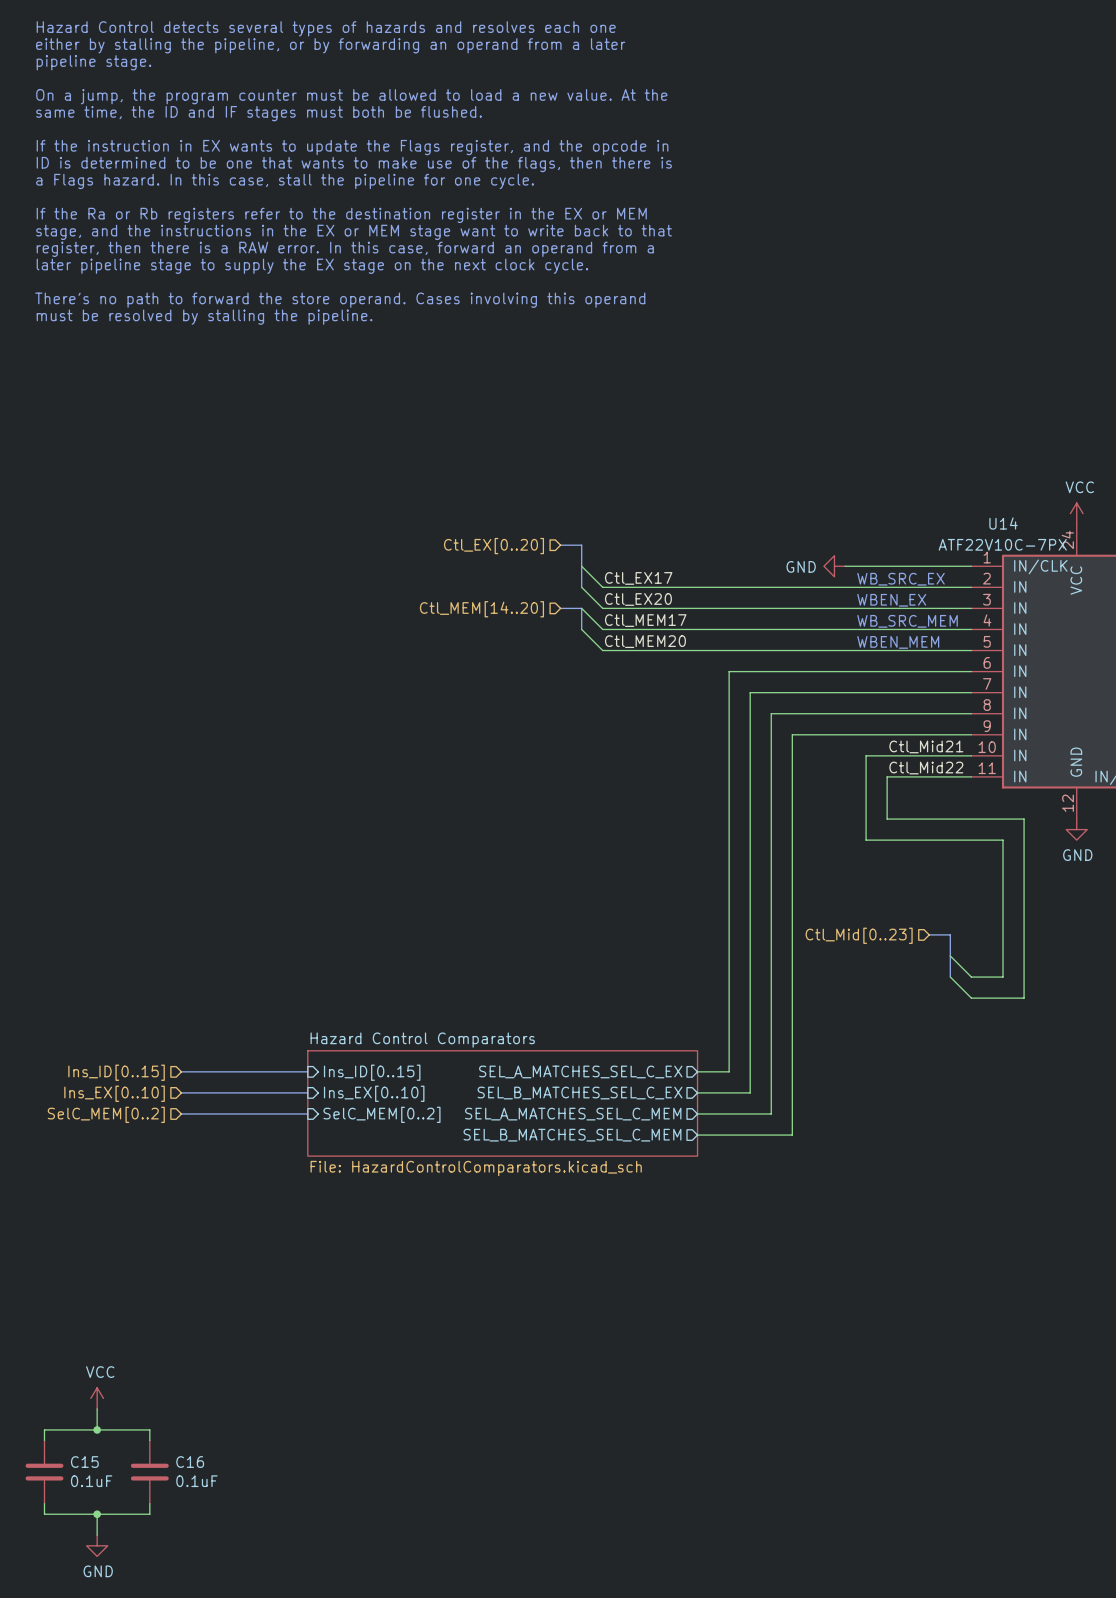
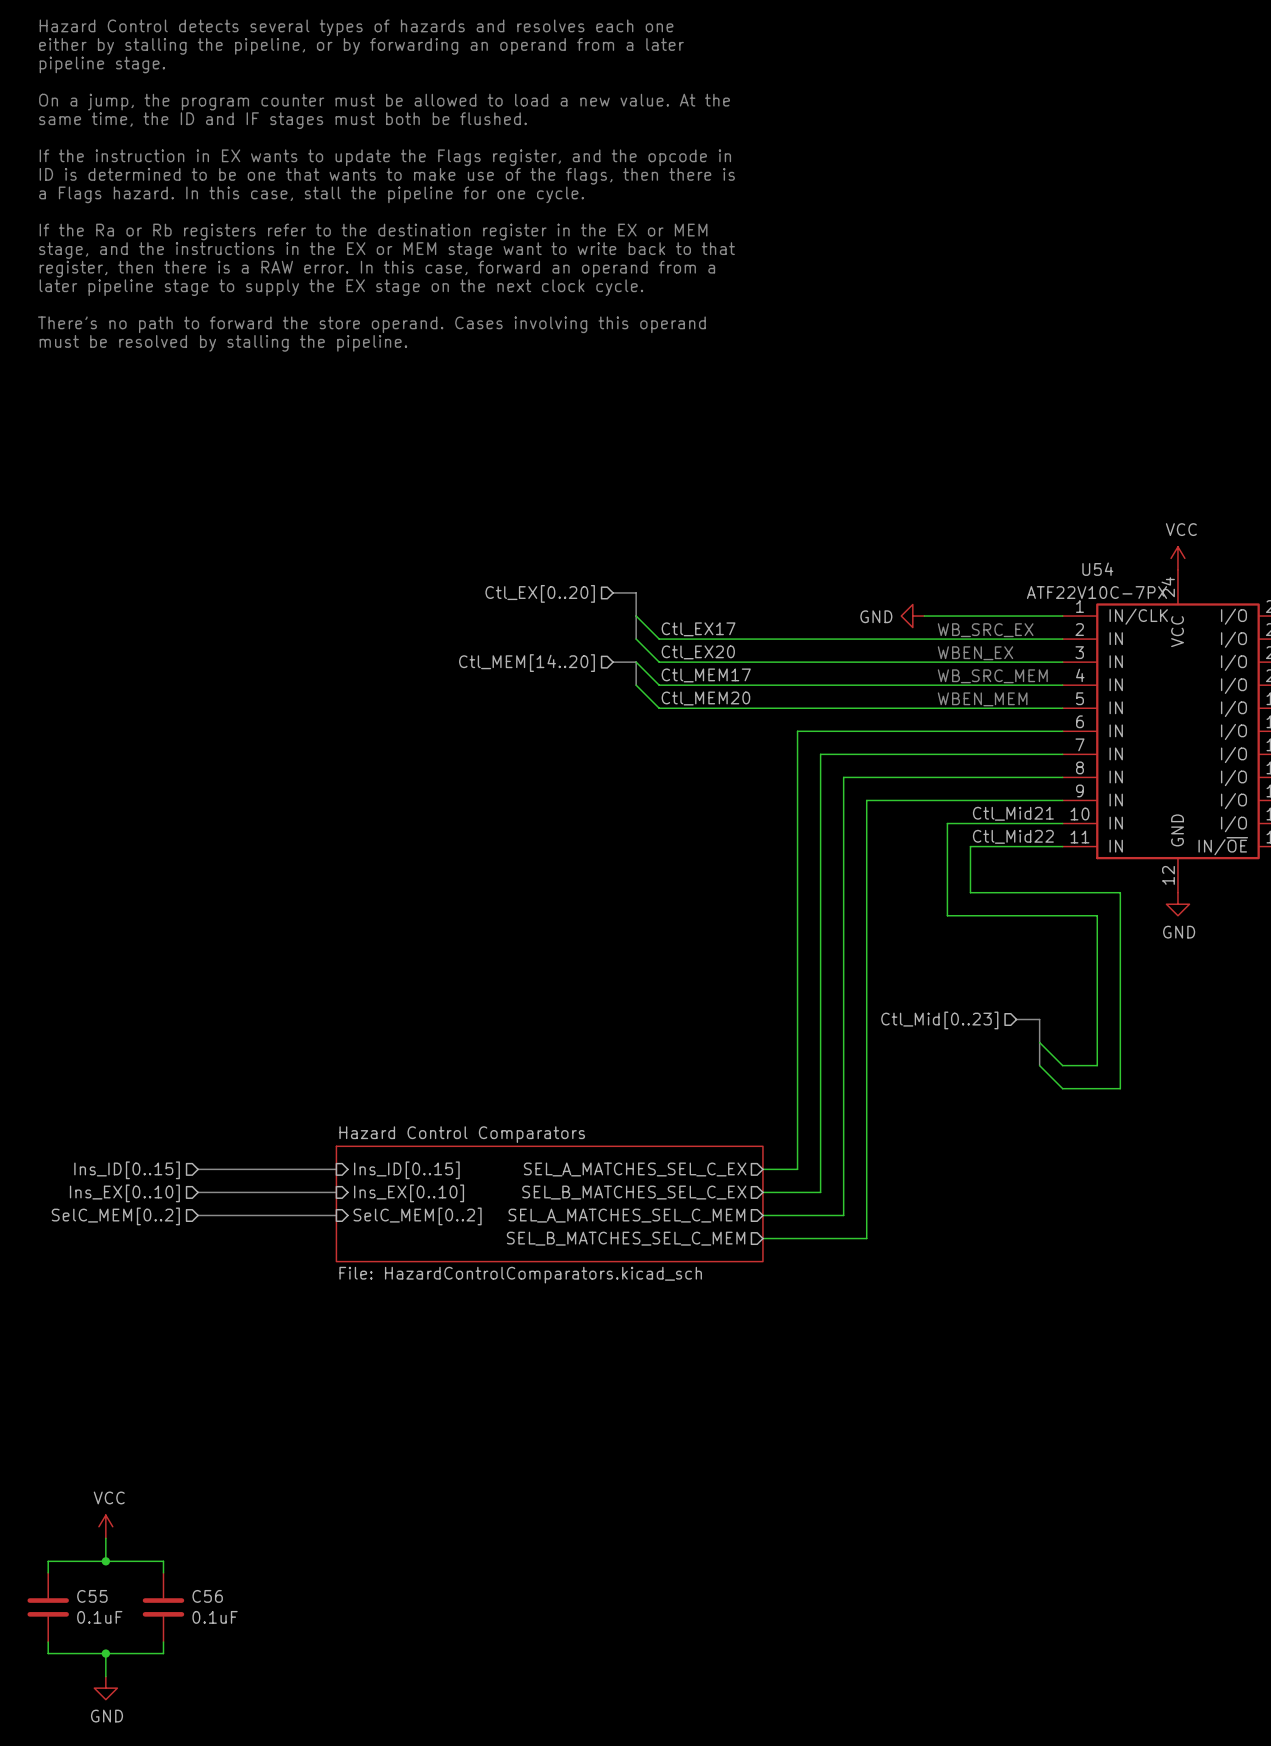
U14 name: U14 (1003, 523) -> U54 (1097, 569)
C15 name: C15 (84, 1462) -> C55 (92, 1596)
C16 name: C16 (190, 1462) -> C56 (207, 1596)

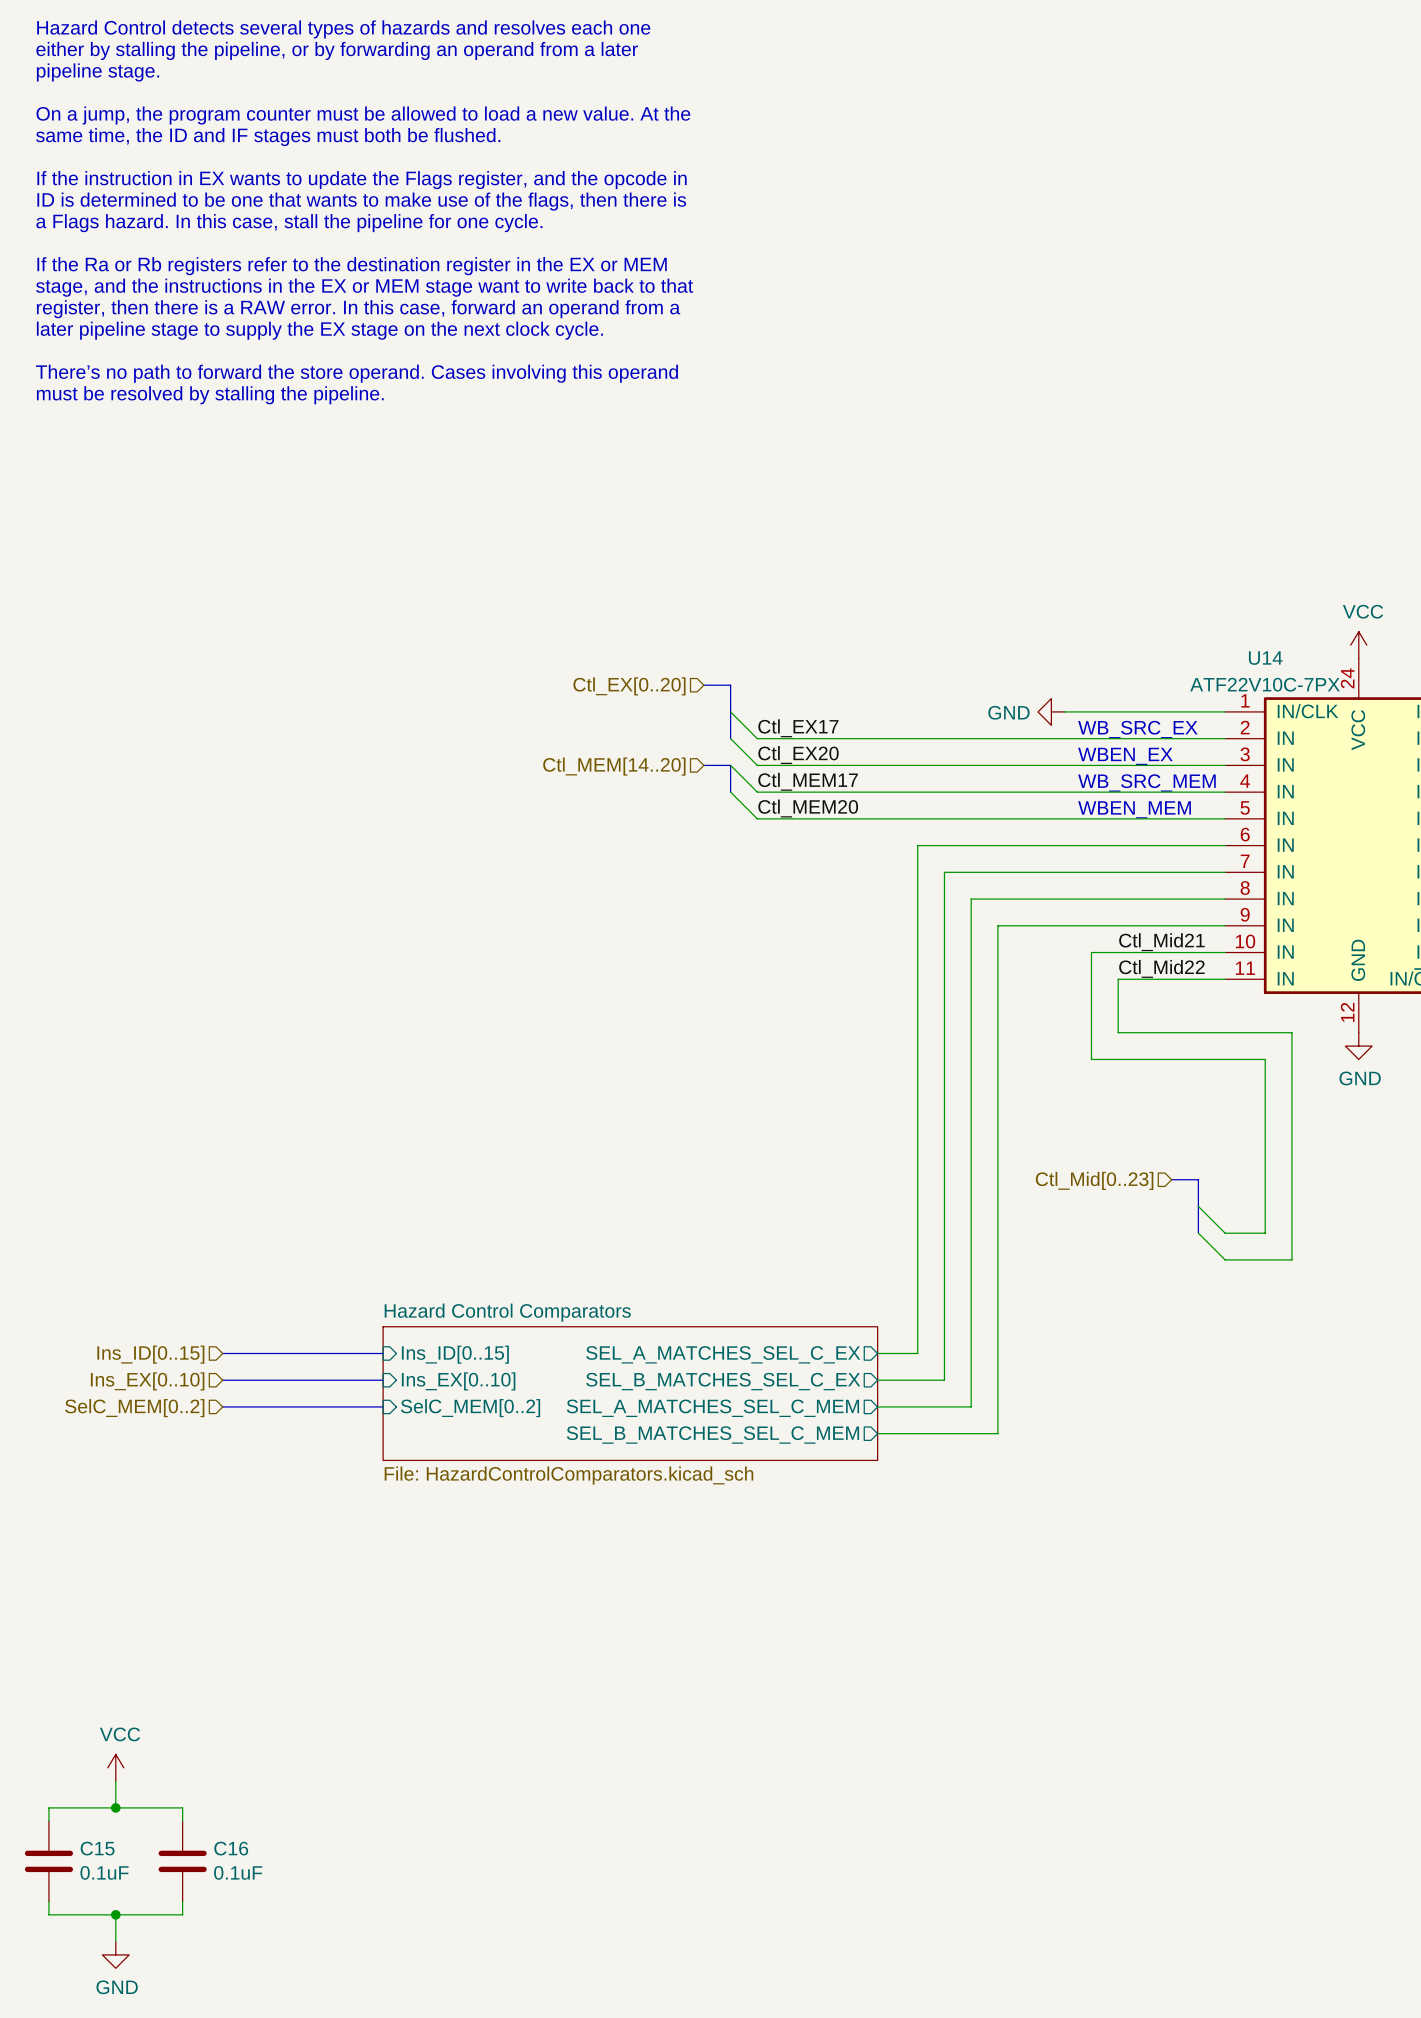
U54 name: U54 (1097, 569) -> U14 (1265, 658)
C55 name: C55 (92, 1596) -> C15 (97, 1848)
C56 name: C56 (207, 1596) -> C16 (231, 1848)

